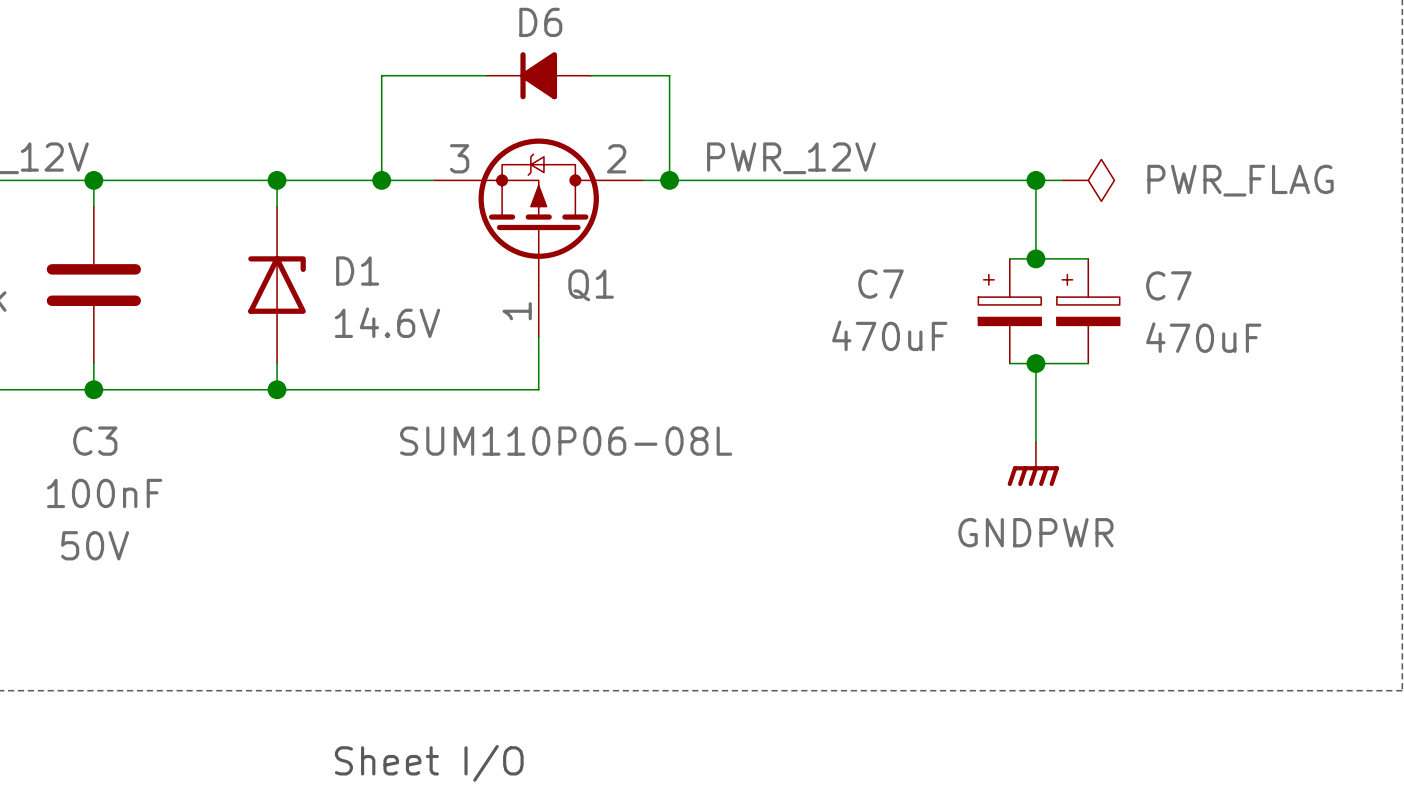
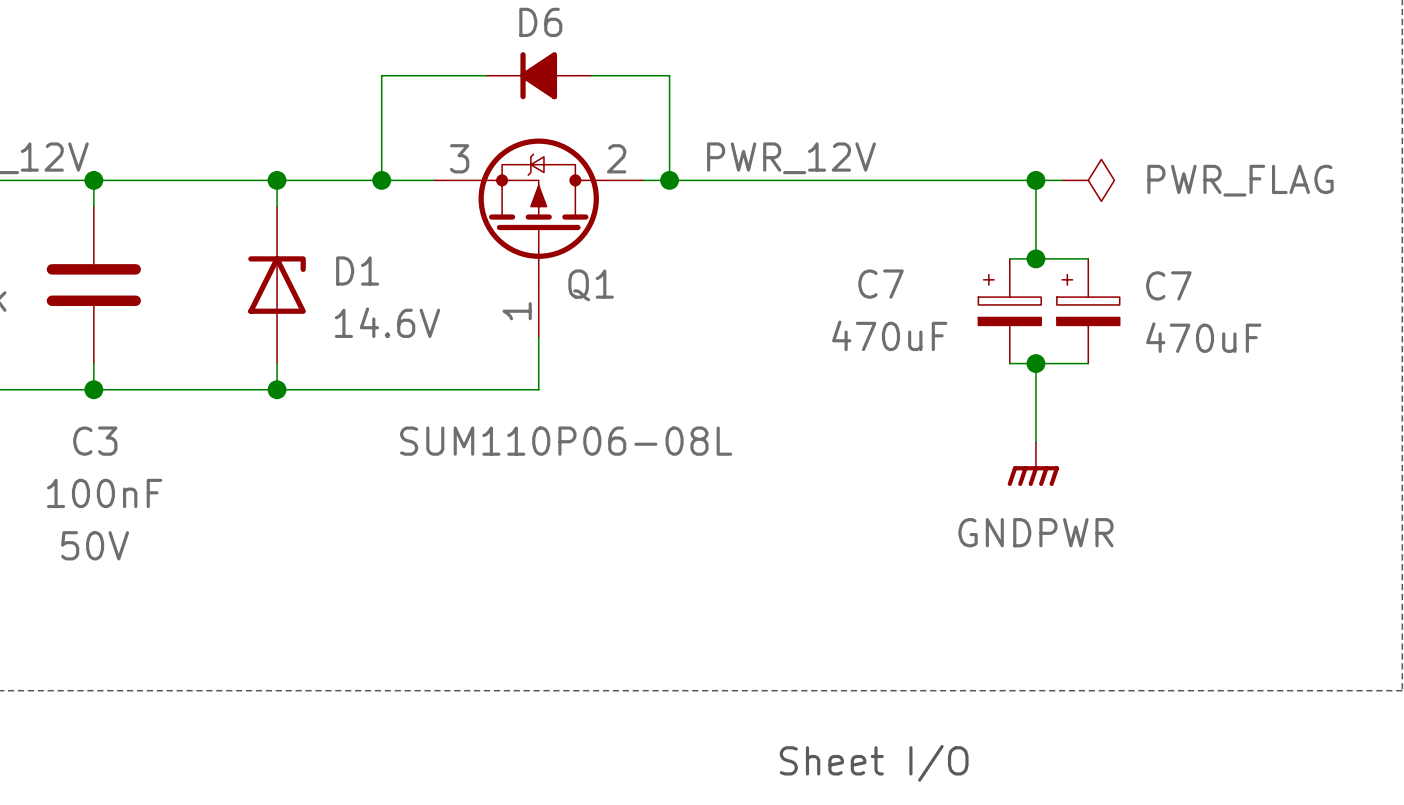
text position: Sheet I/O (429, 763) -> Sheet I/O (874, 763)

